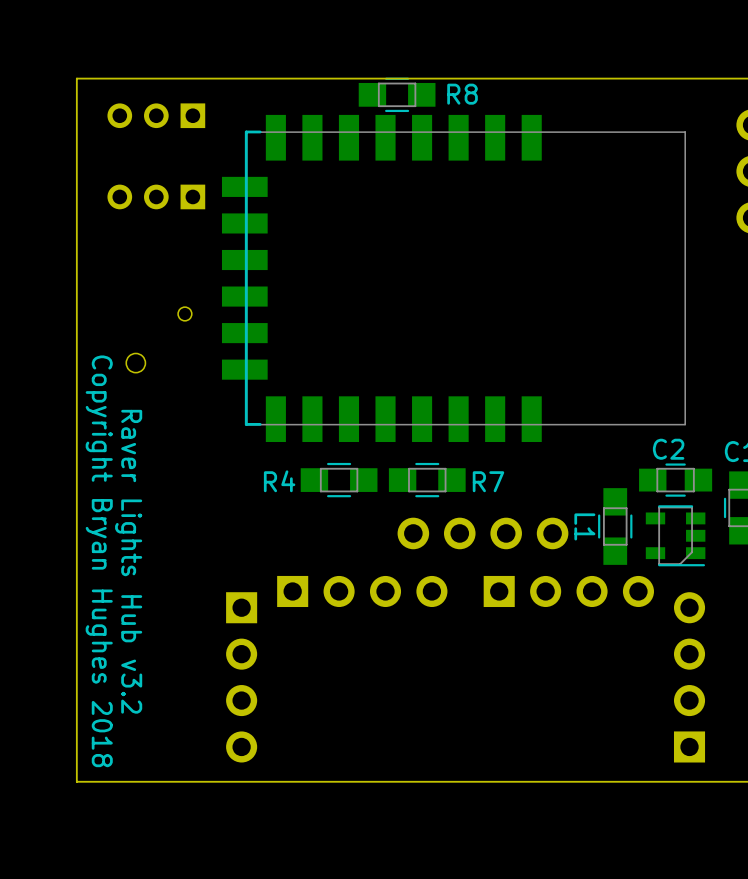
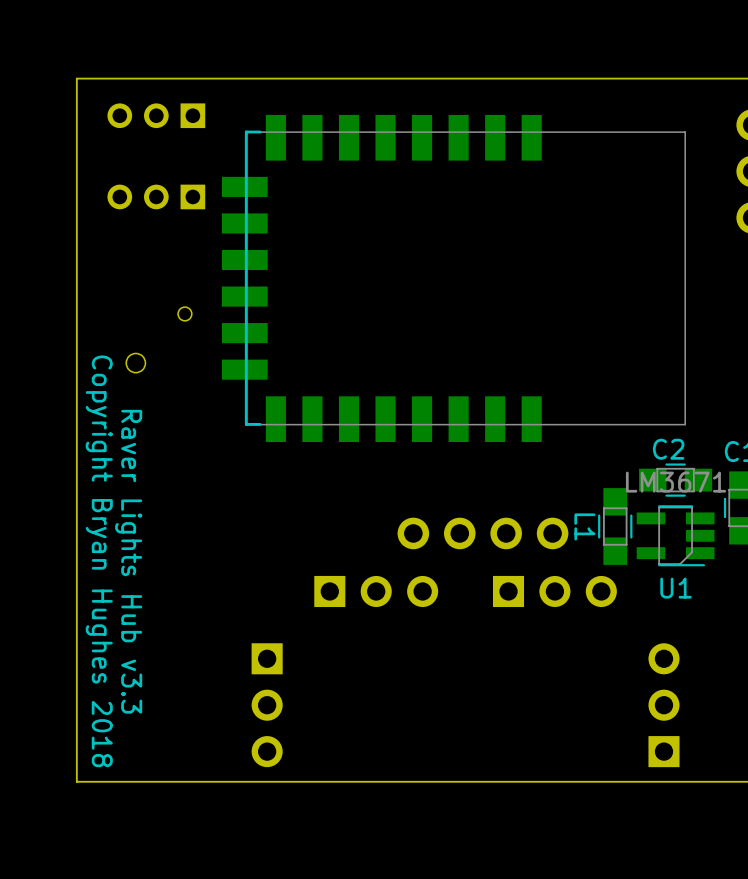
R8: (397, 94) -> none
R4: (339, 480) -> none
R7: (427, 480) -> none
part: (675, 535) -> none
U1: none -> LM3671 (675, 535)
text: Raver Lights Hub v3.2 (128, 561) -> Raver Lights Hub v3.3 (128, 561)
part footprint: [277, 575, 448, 608] -> [314, 575, 439, 608]
part footprint: [483, 575, 654, 608] -> [492, 575, 617, 608]
part: (241, 677) -> none
part: (689, 677) -> none
part: none -> (267, 705)
part: none -> (663, 705)

